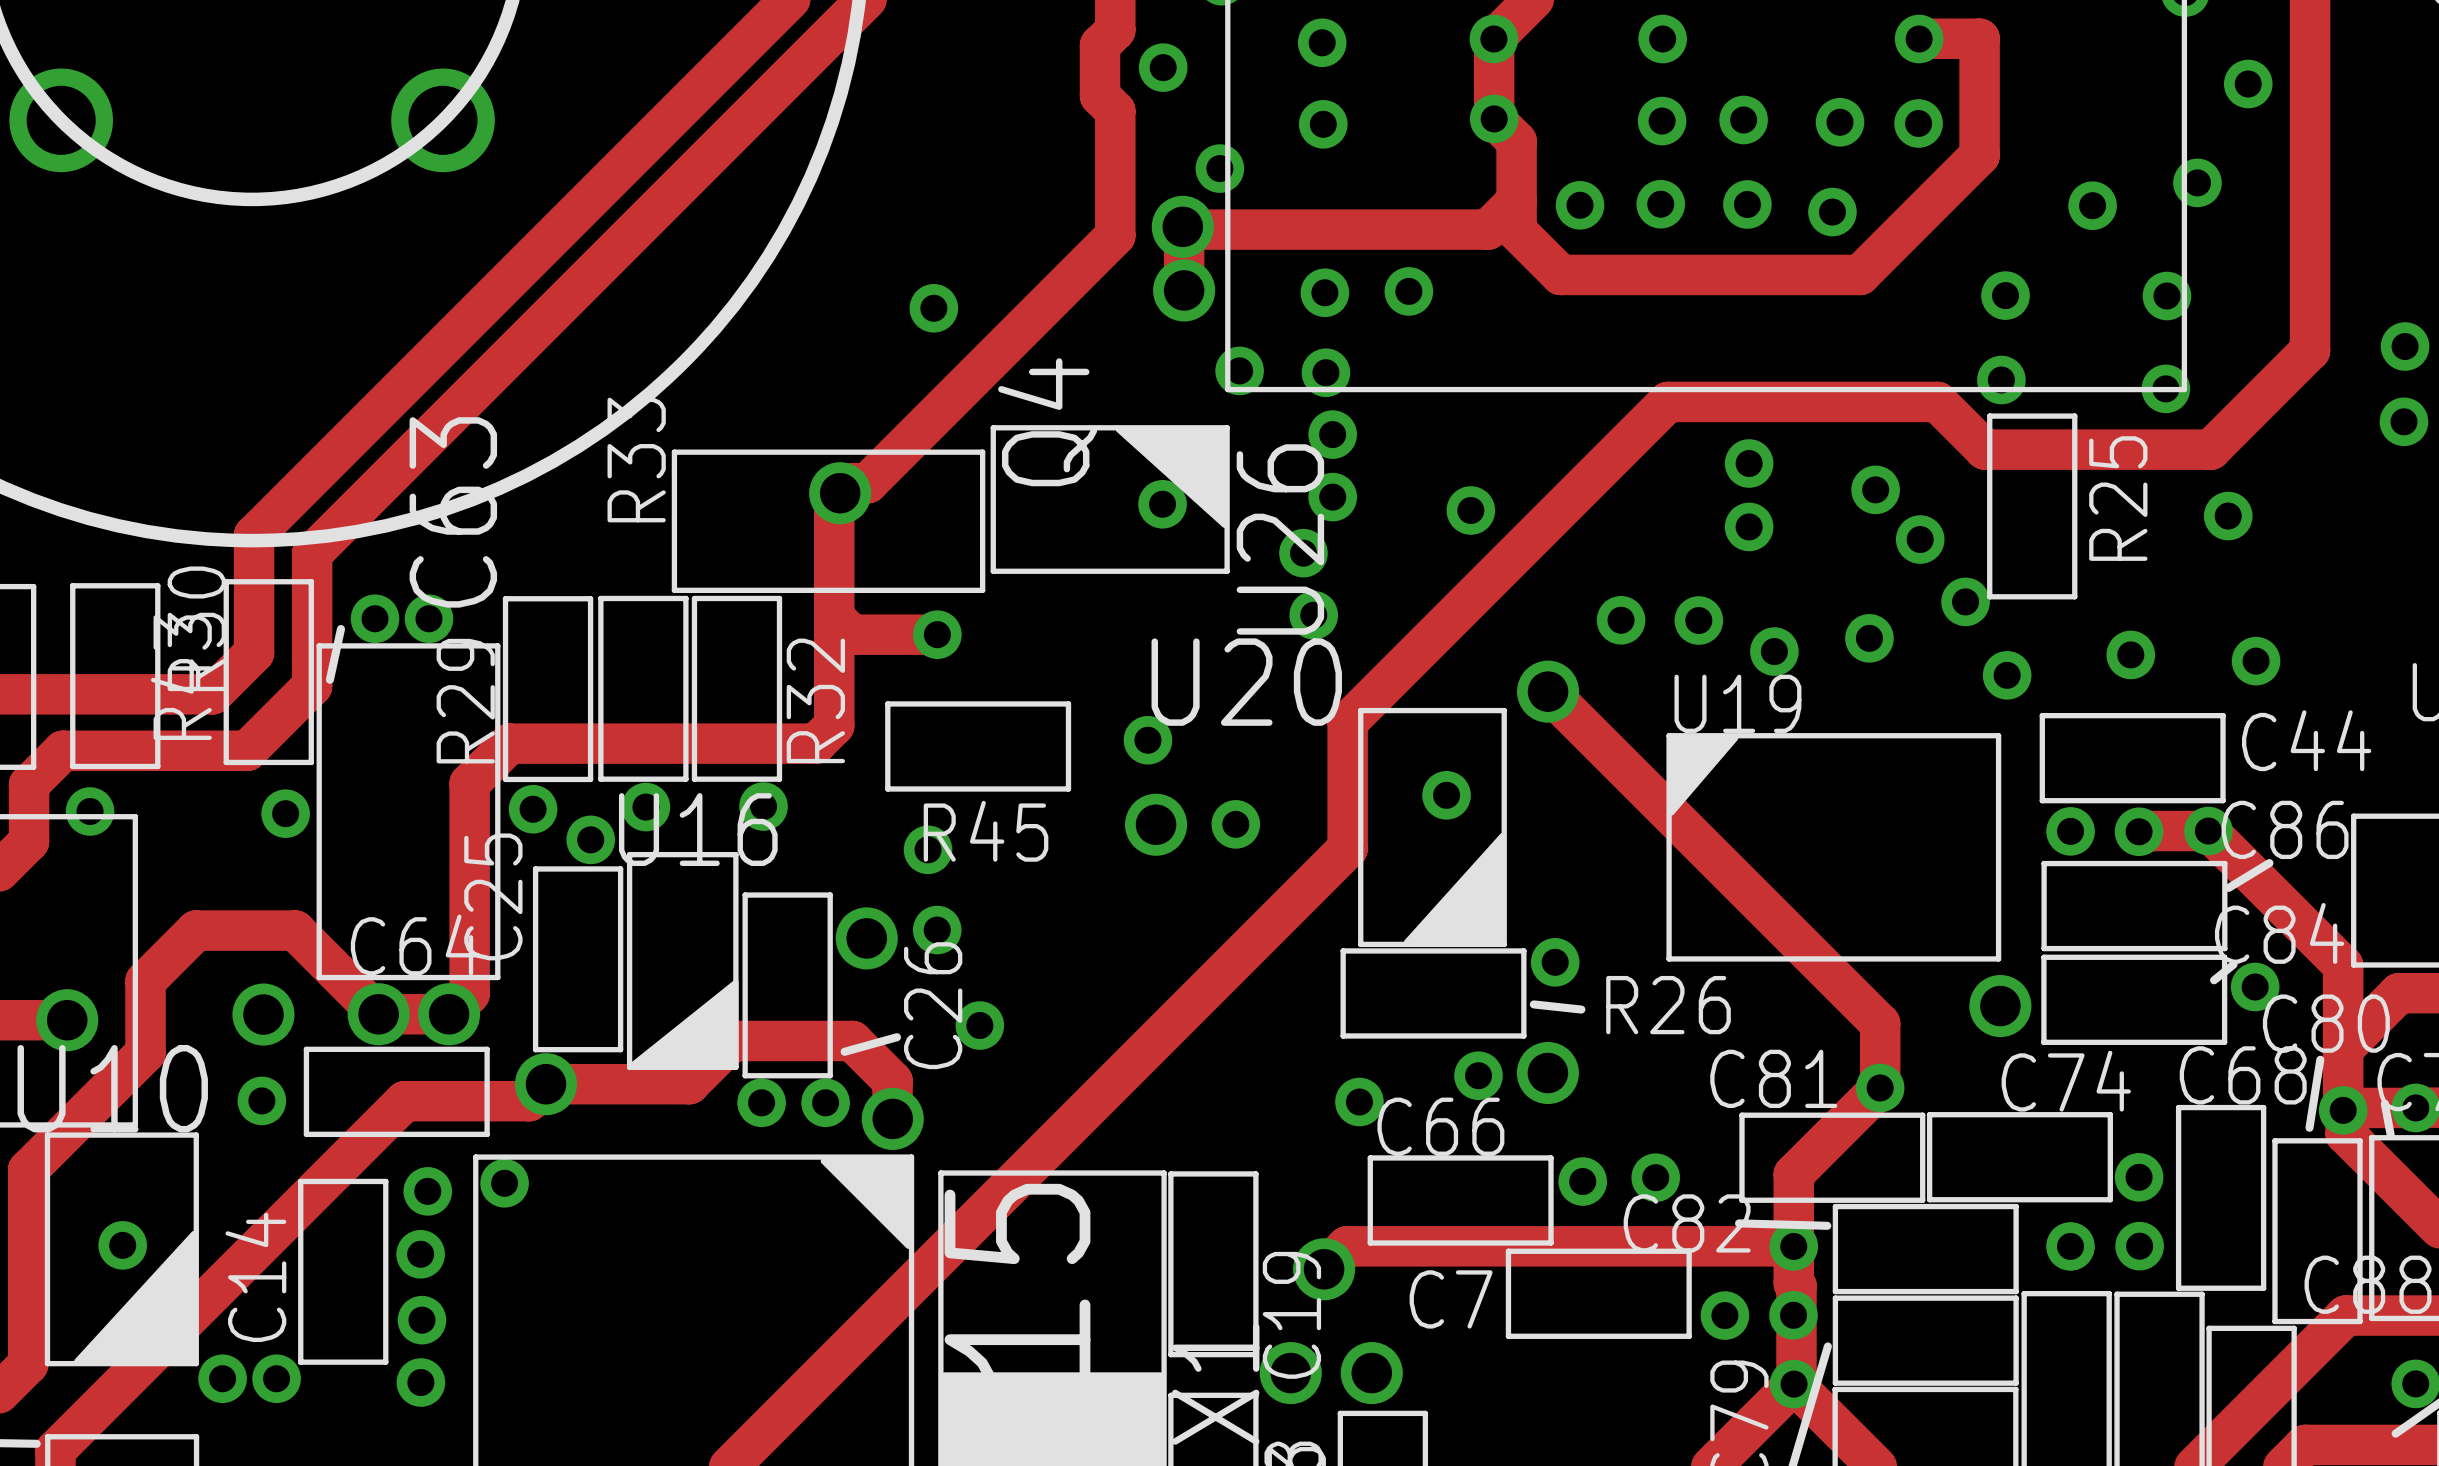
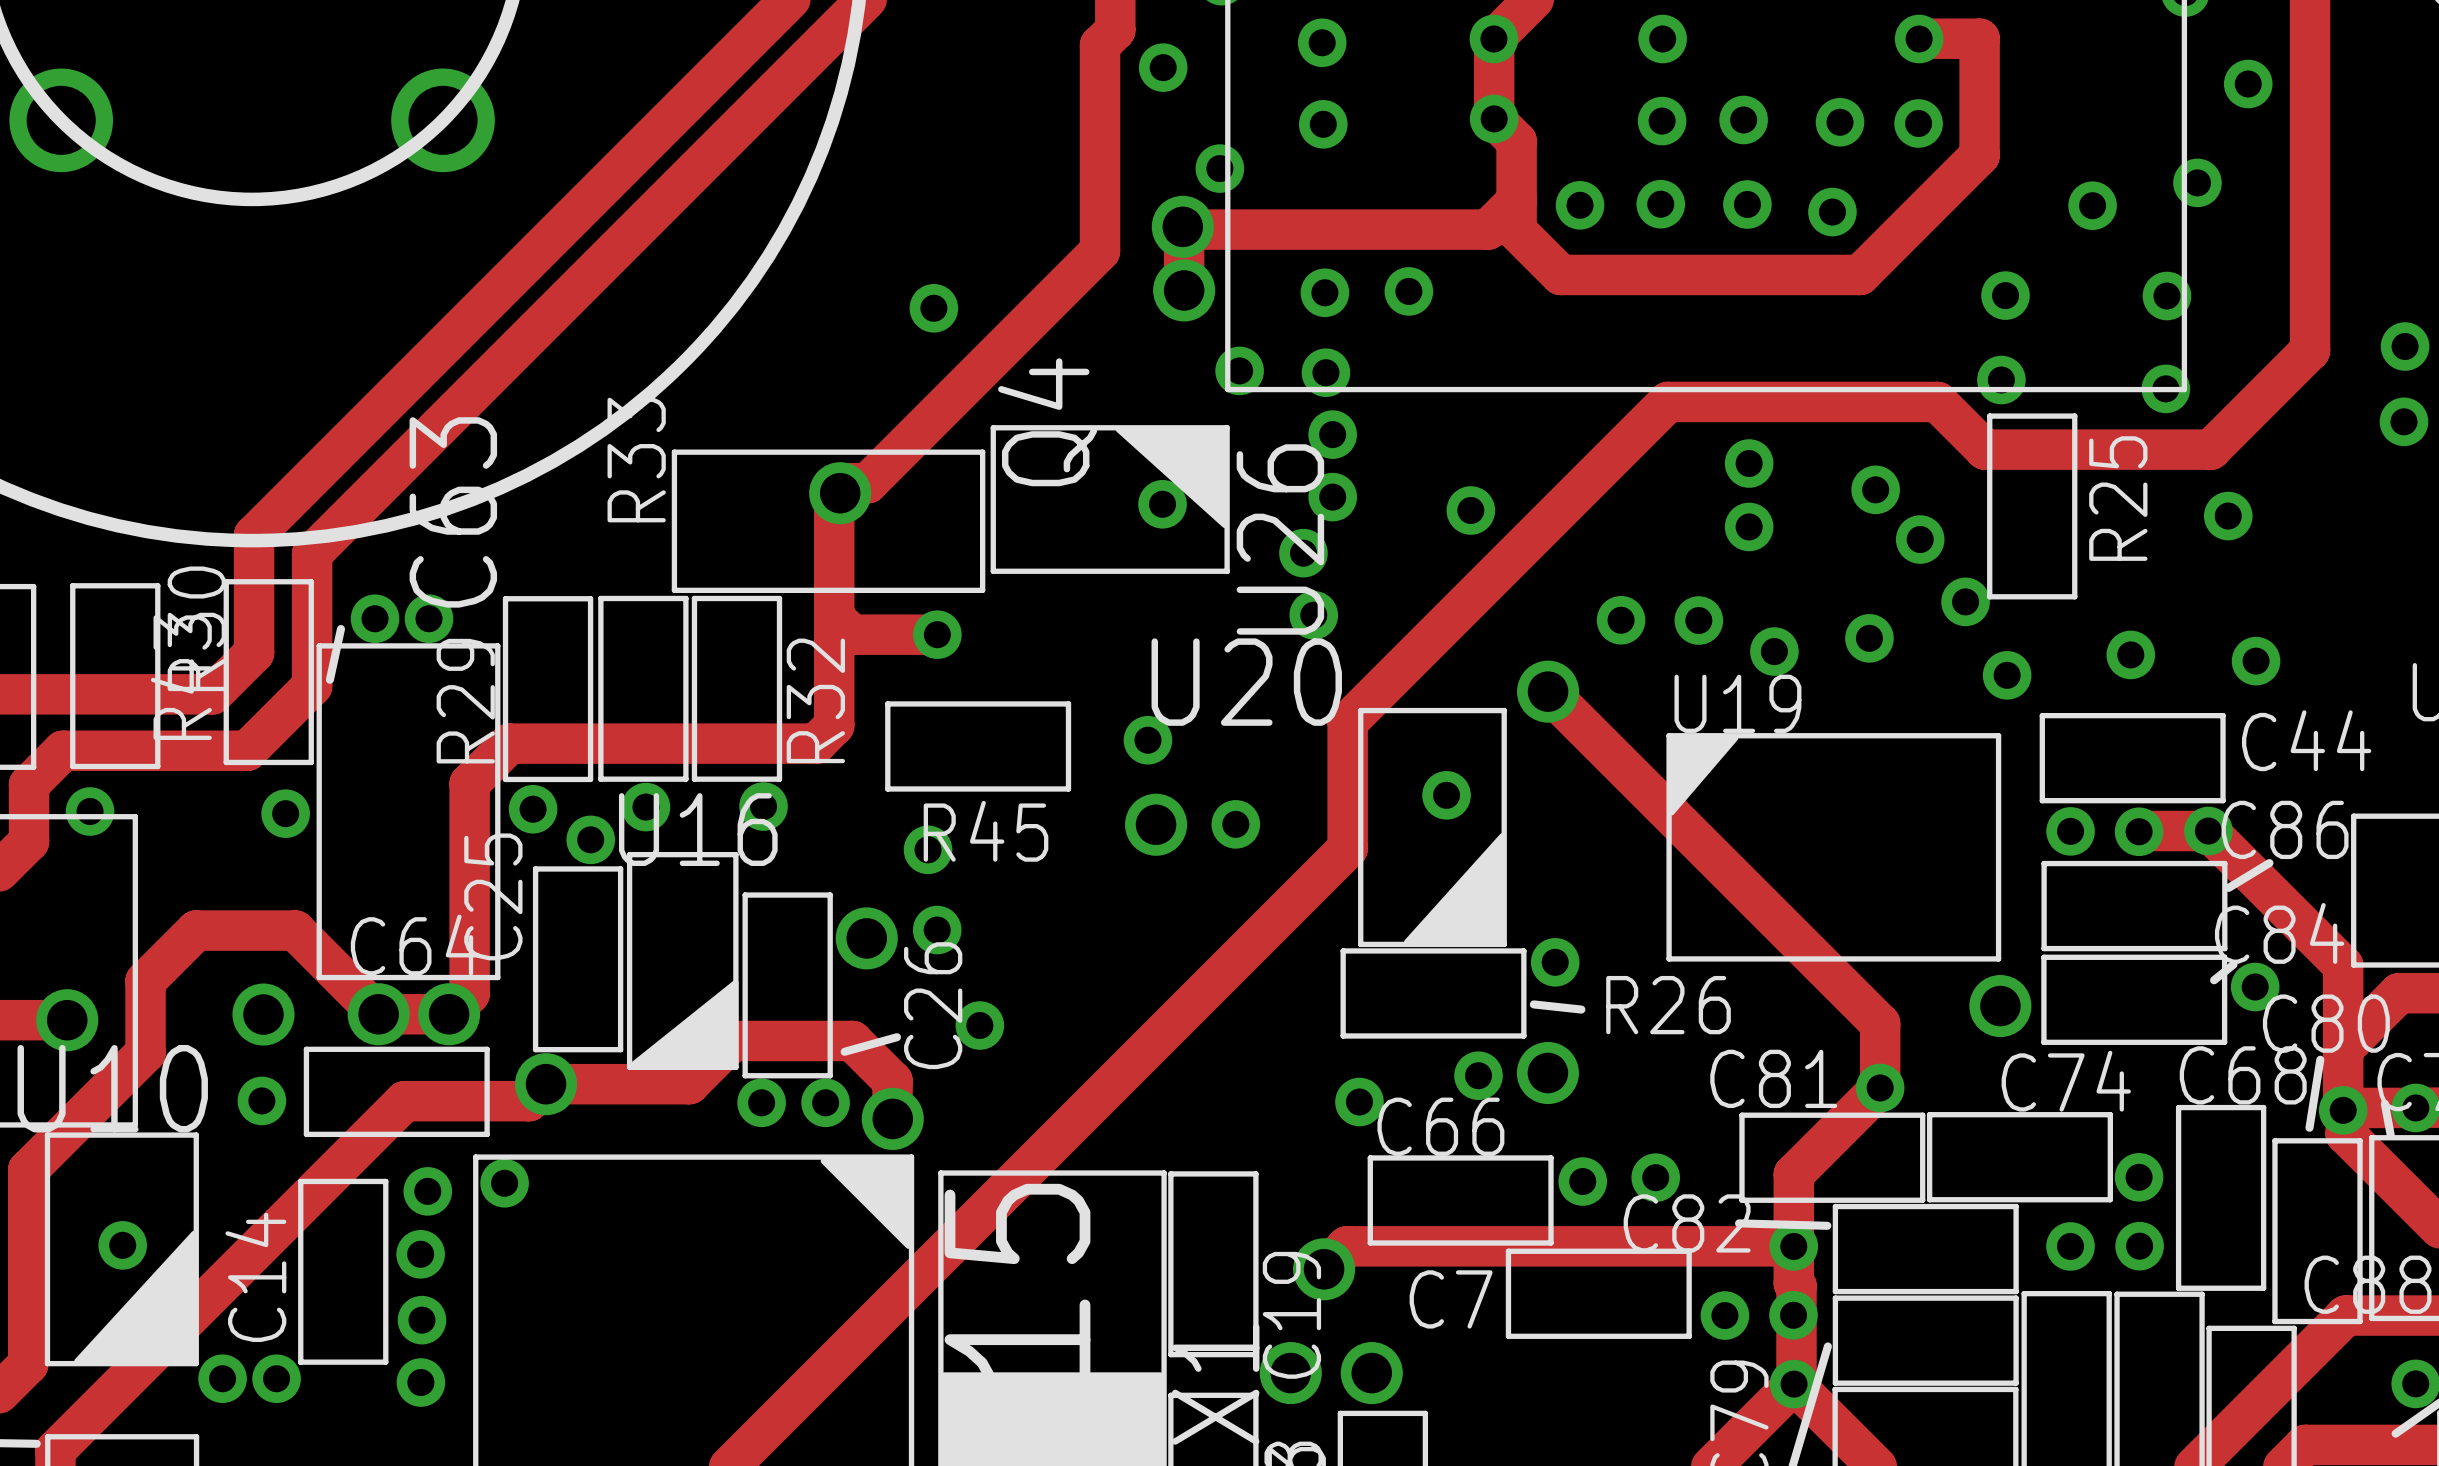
track: (1100, 95) (1115, 111) (1115, 235) (1100, 250) -> (1100, 95) (1100, 250)

